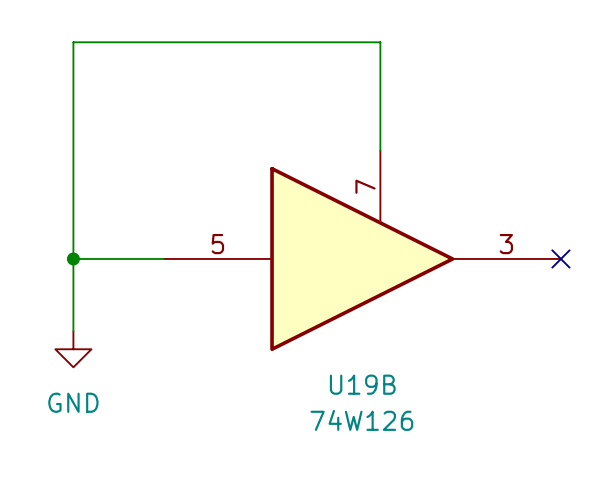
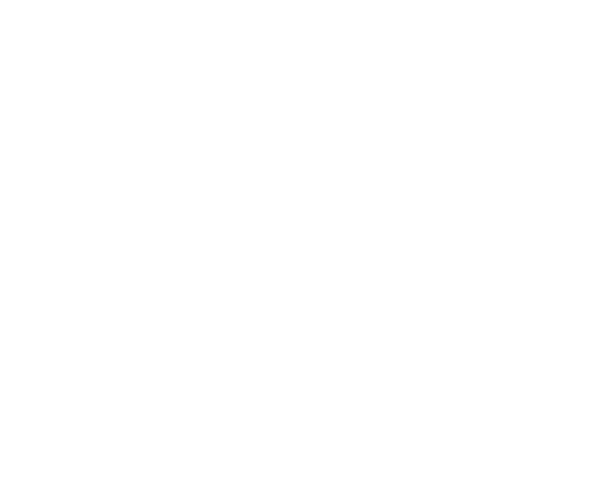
wire: (380, 150) (380, 42) (73, 42) (73, 331) -> none
U19B: 74W126 (362, 250) -> none
wire: (73, 258) (163, 258) -> none
junction: (73, 258) -> none
no-connect mark: (560, 258) -> none
power symbol: GND (73, 349) -> none

